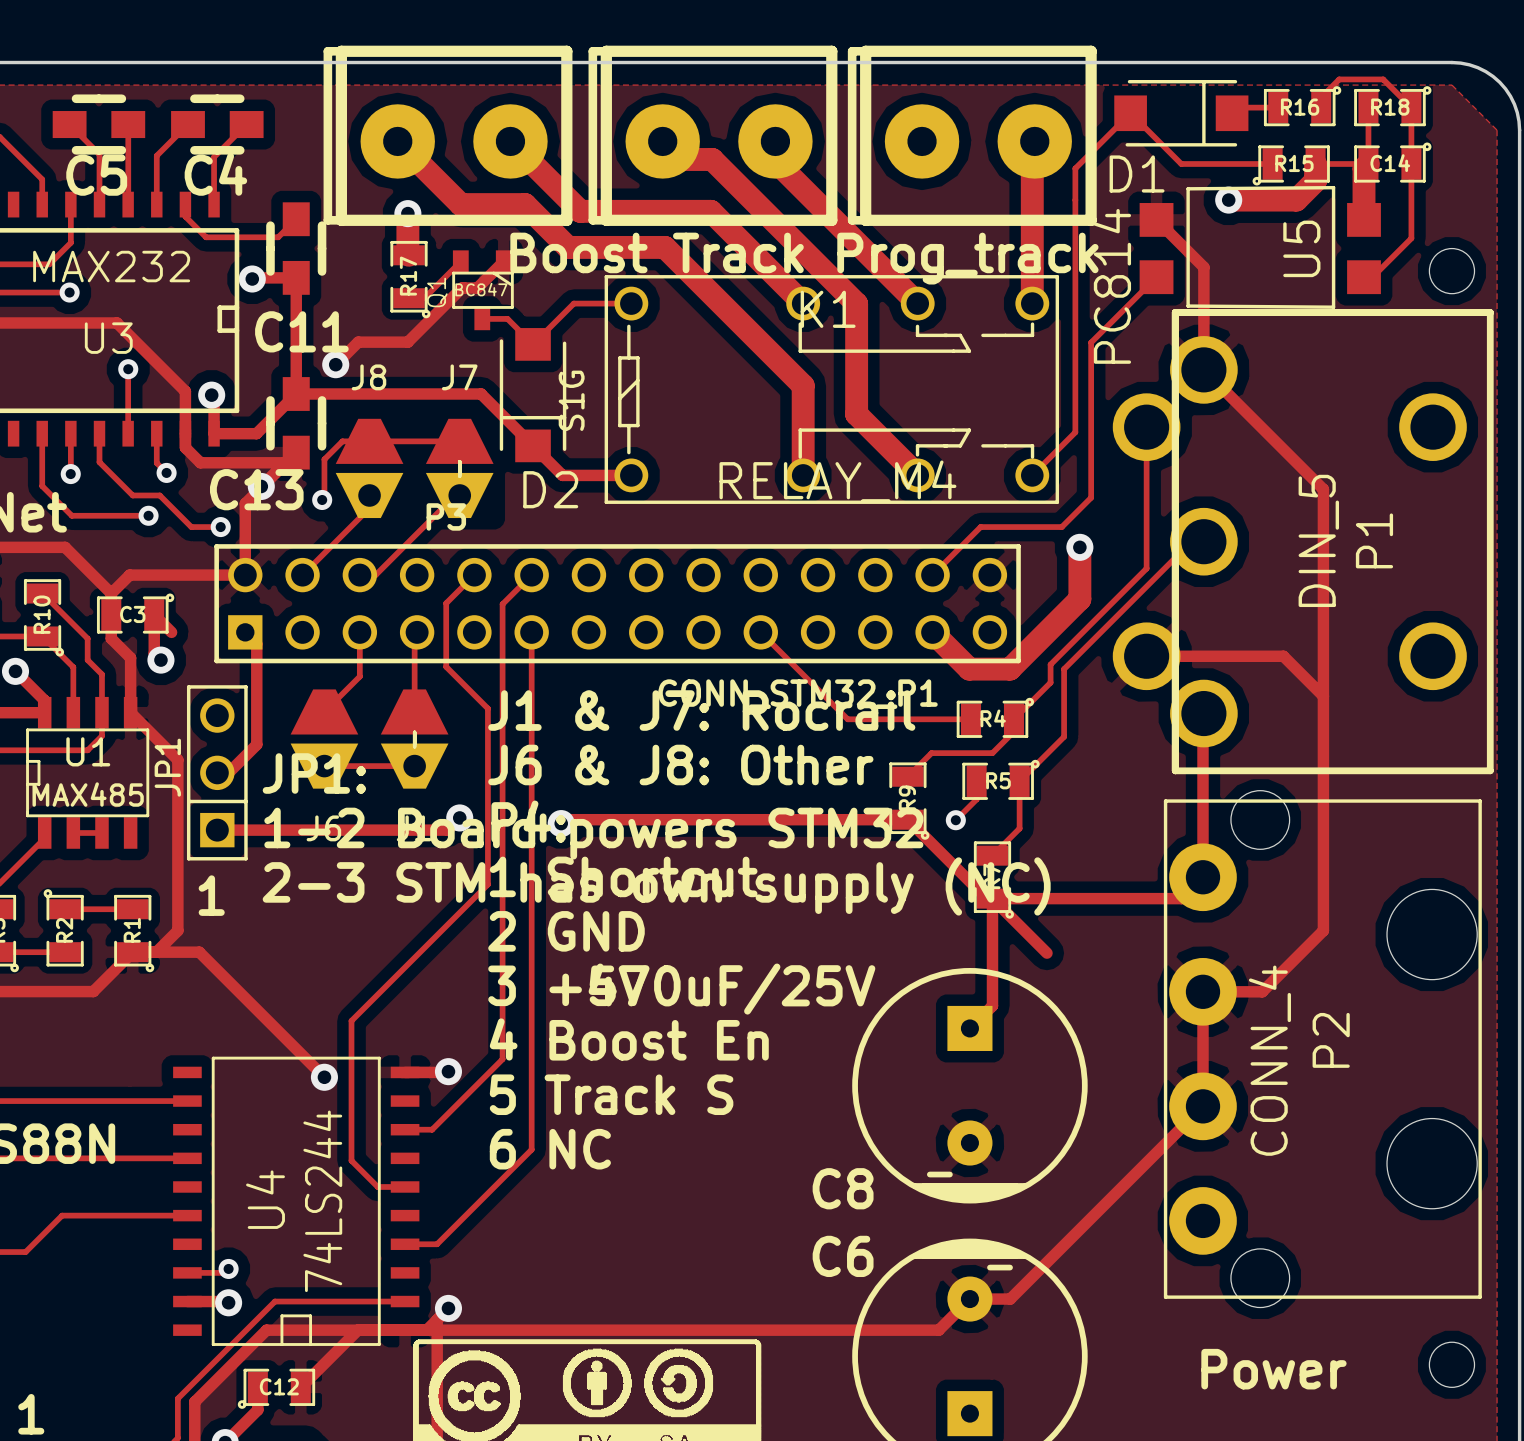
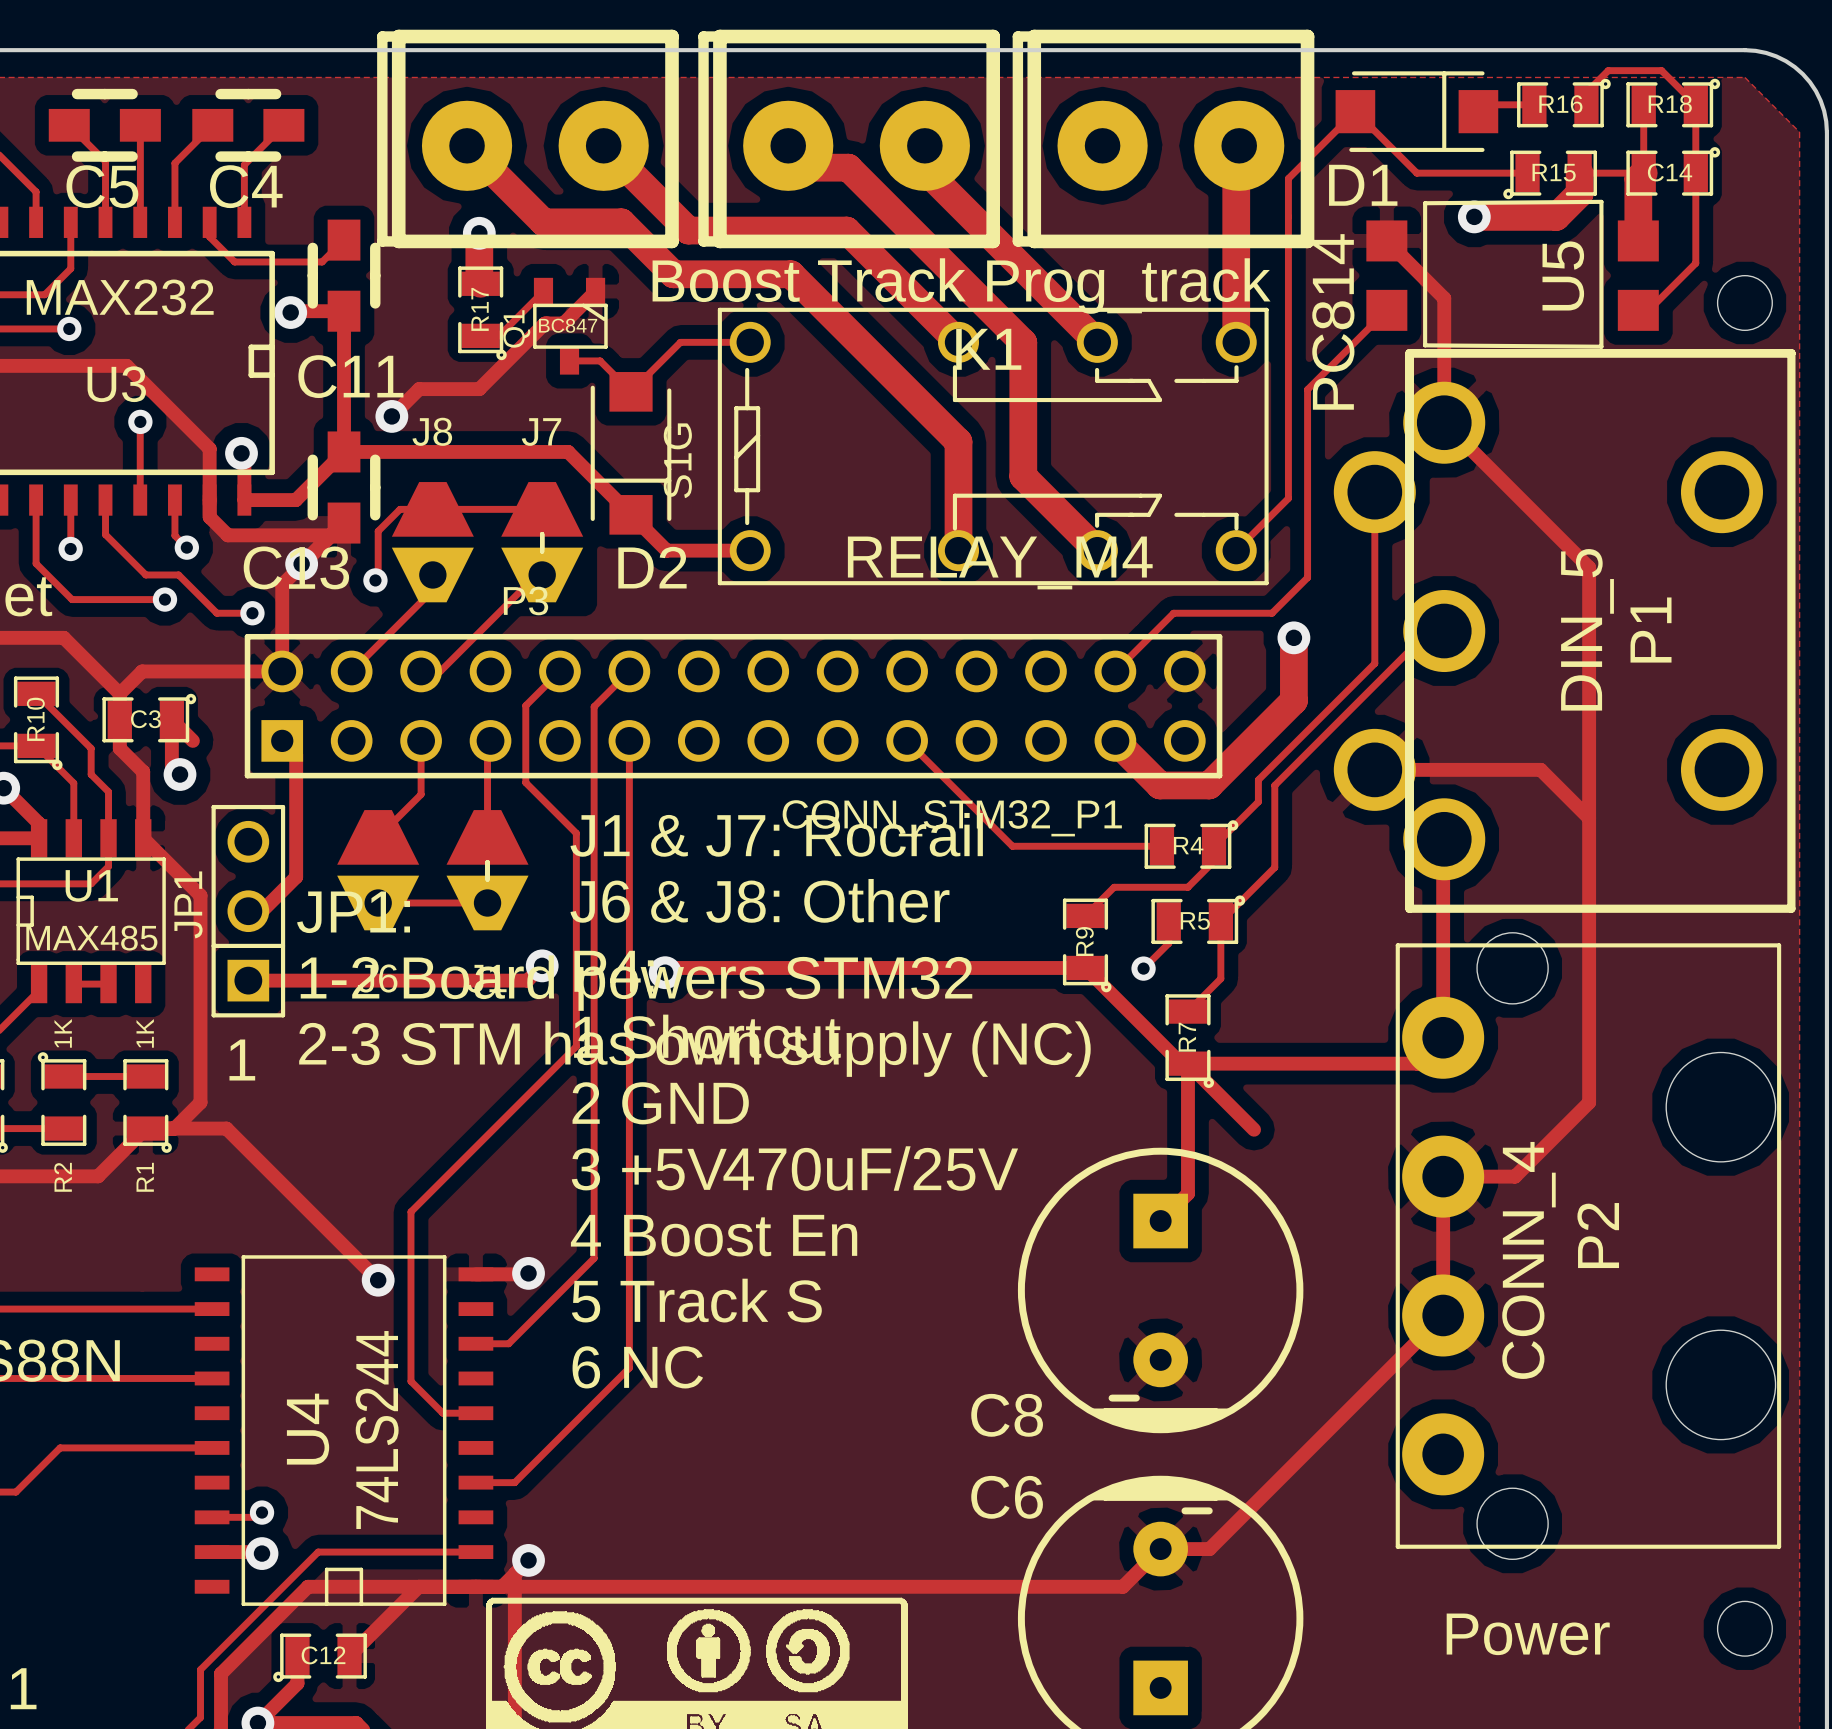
R2 value: none -> 1K (63, 1033)
R1 value: none -> 1K (145, 1033)
R2 name position: R2 (64, 930) -> R2 (63, 1177)
R1 name position: R1 (132, 930) -> R1 (145, 1177)

